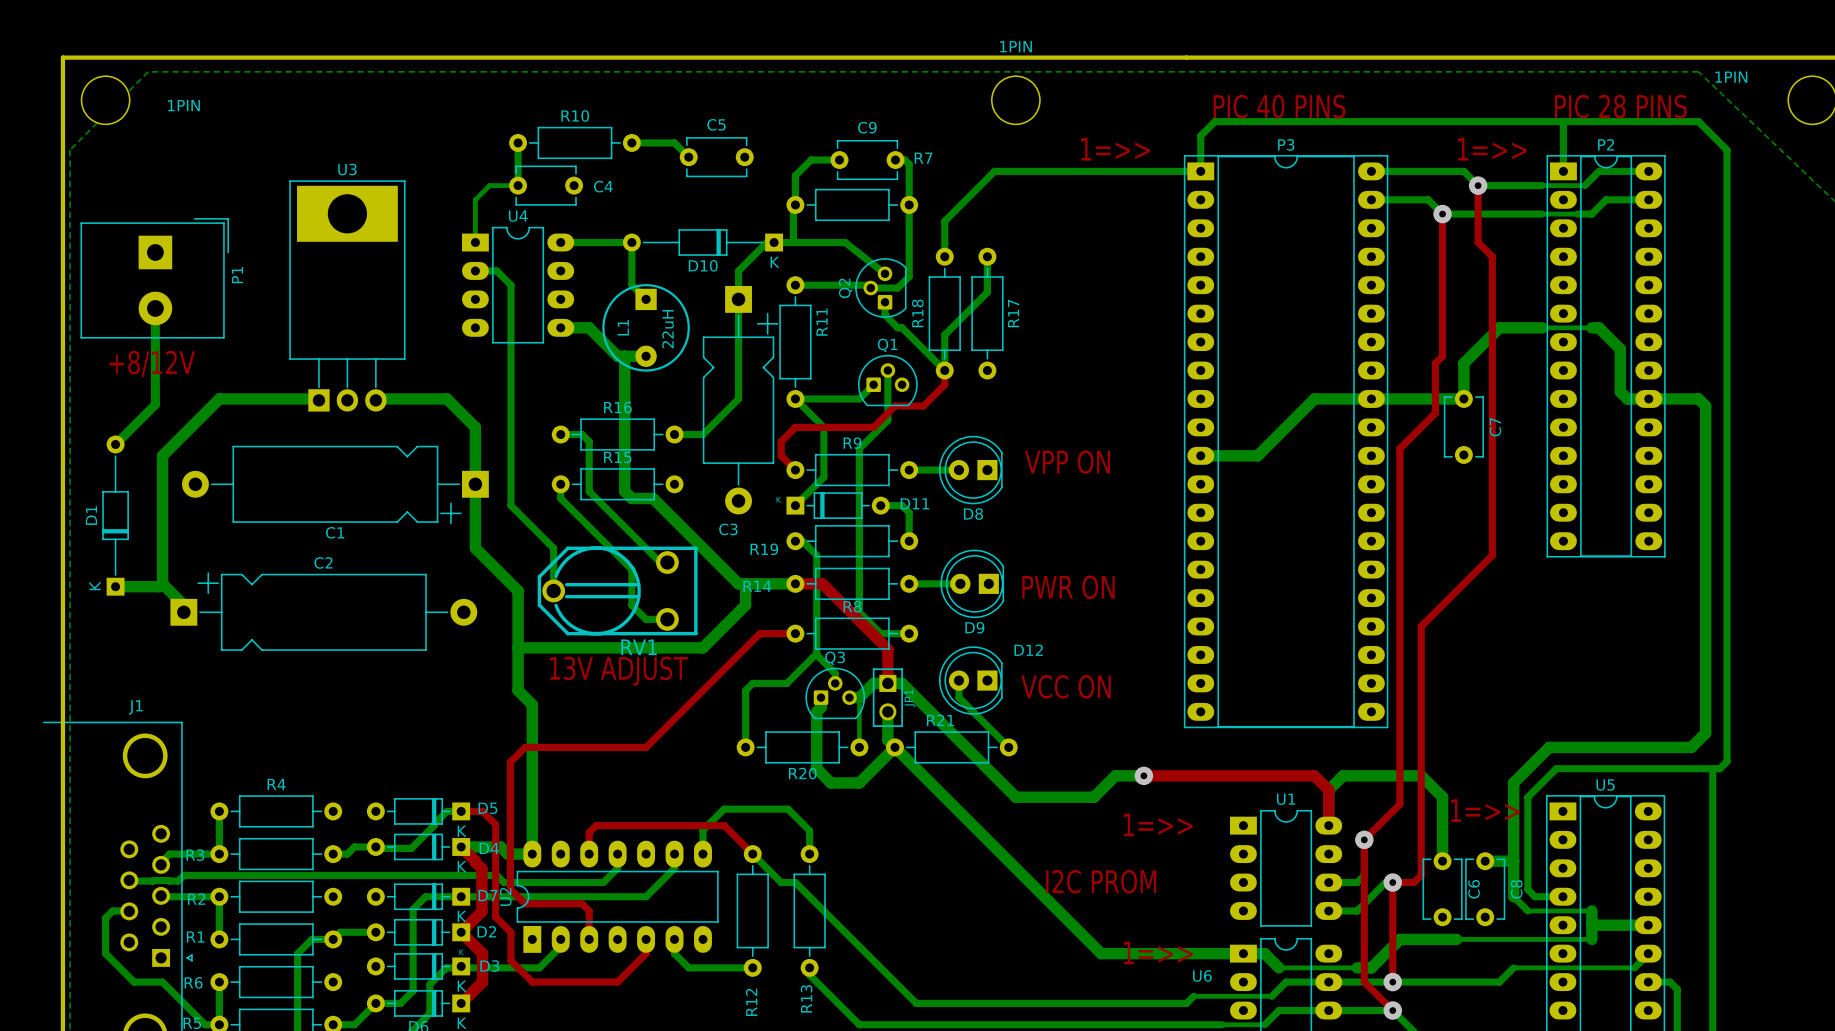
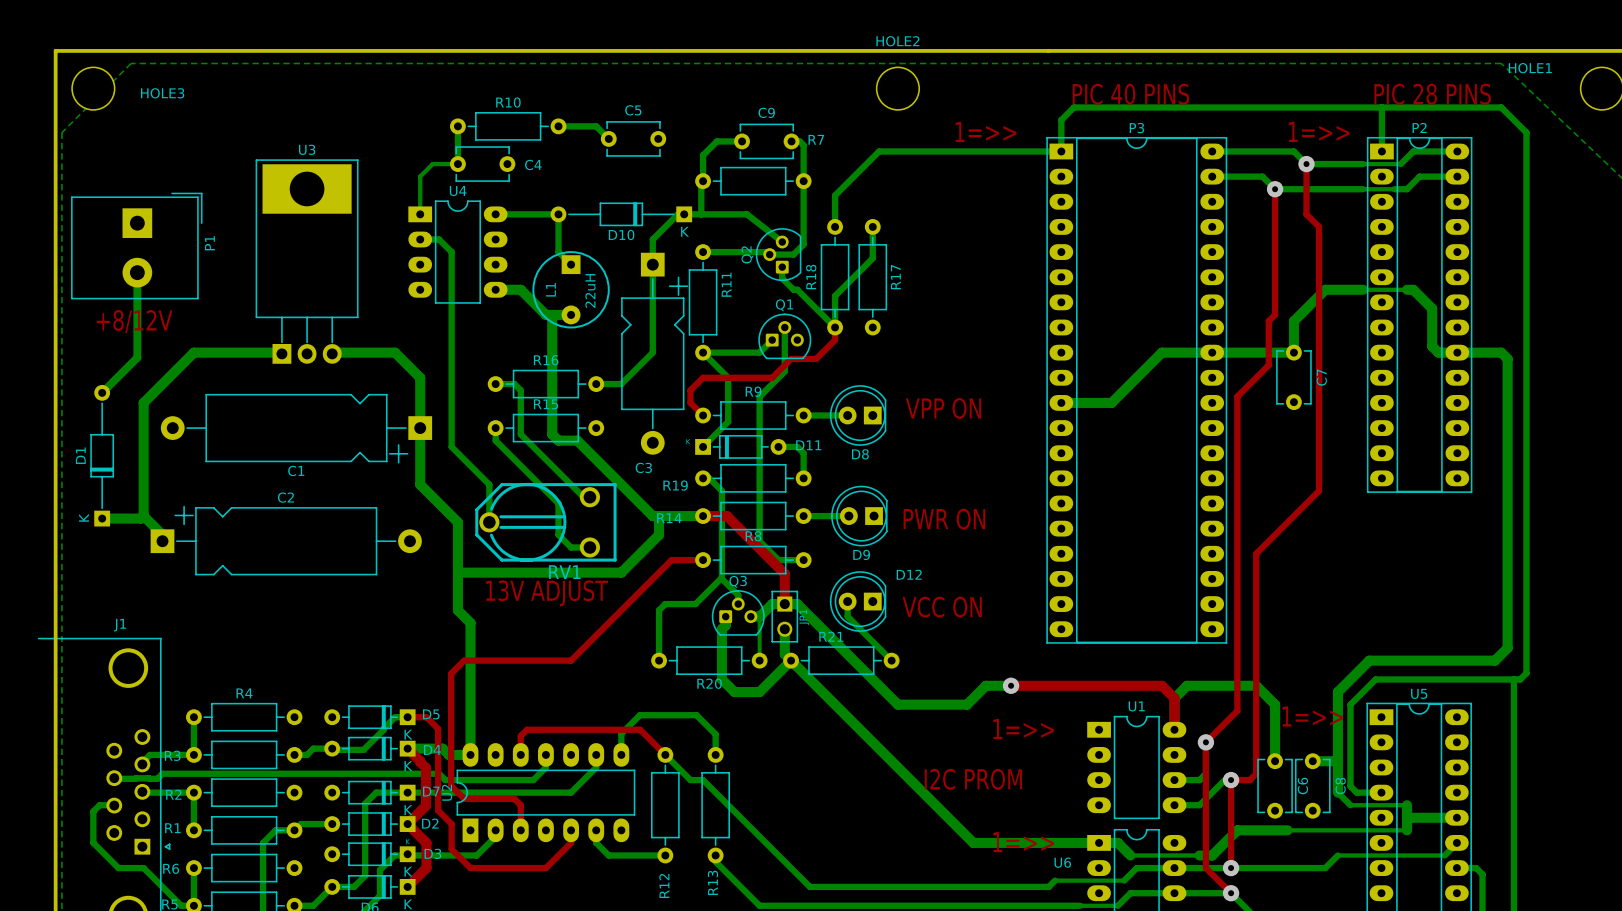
1PIN name: 1PIN (1015, 46) -> HOLE2 (897, 41)
1PIN name: 1PIN (1731, 77) -> HOLE1 (1530, 68)
1PIN name: 1PIN (183, 105) -> HOLE3 (162, 93)

